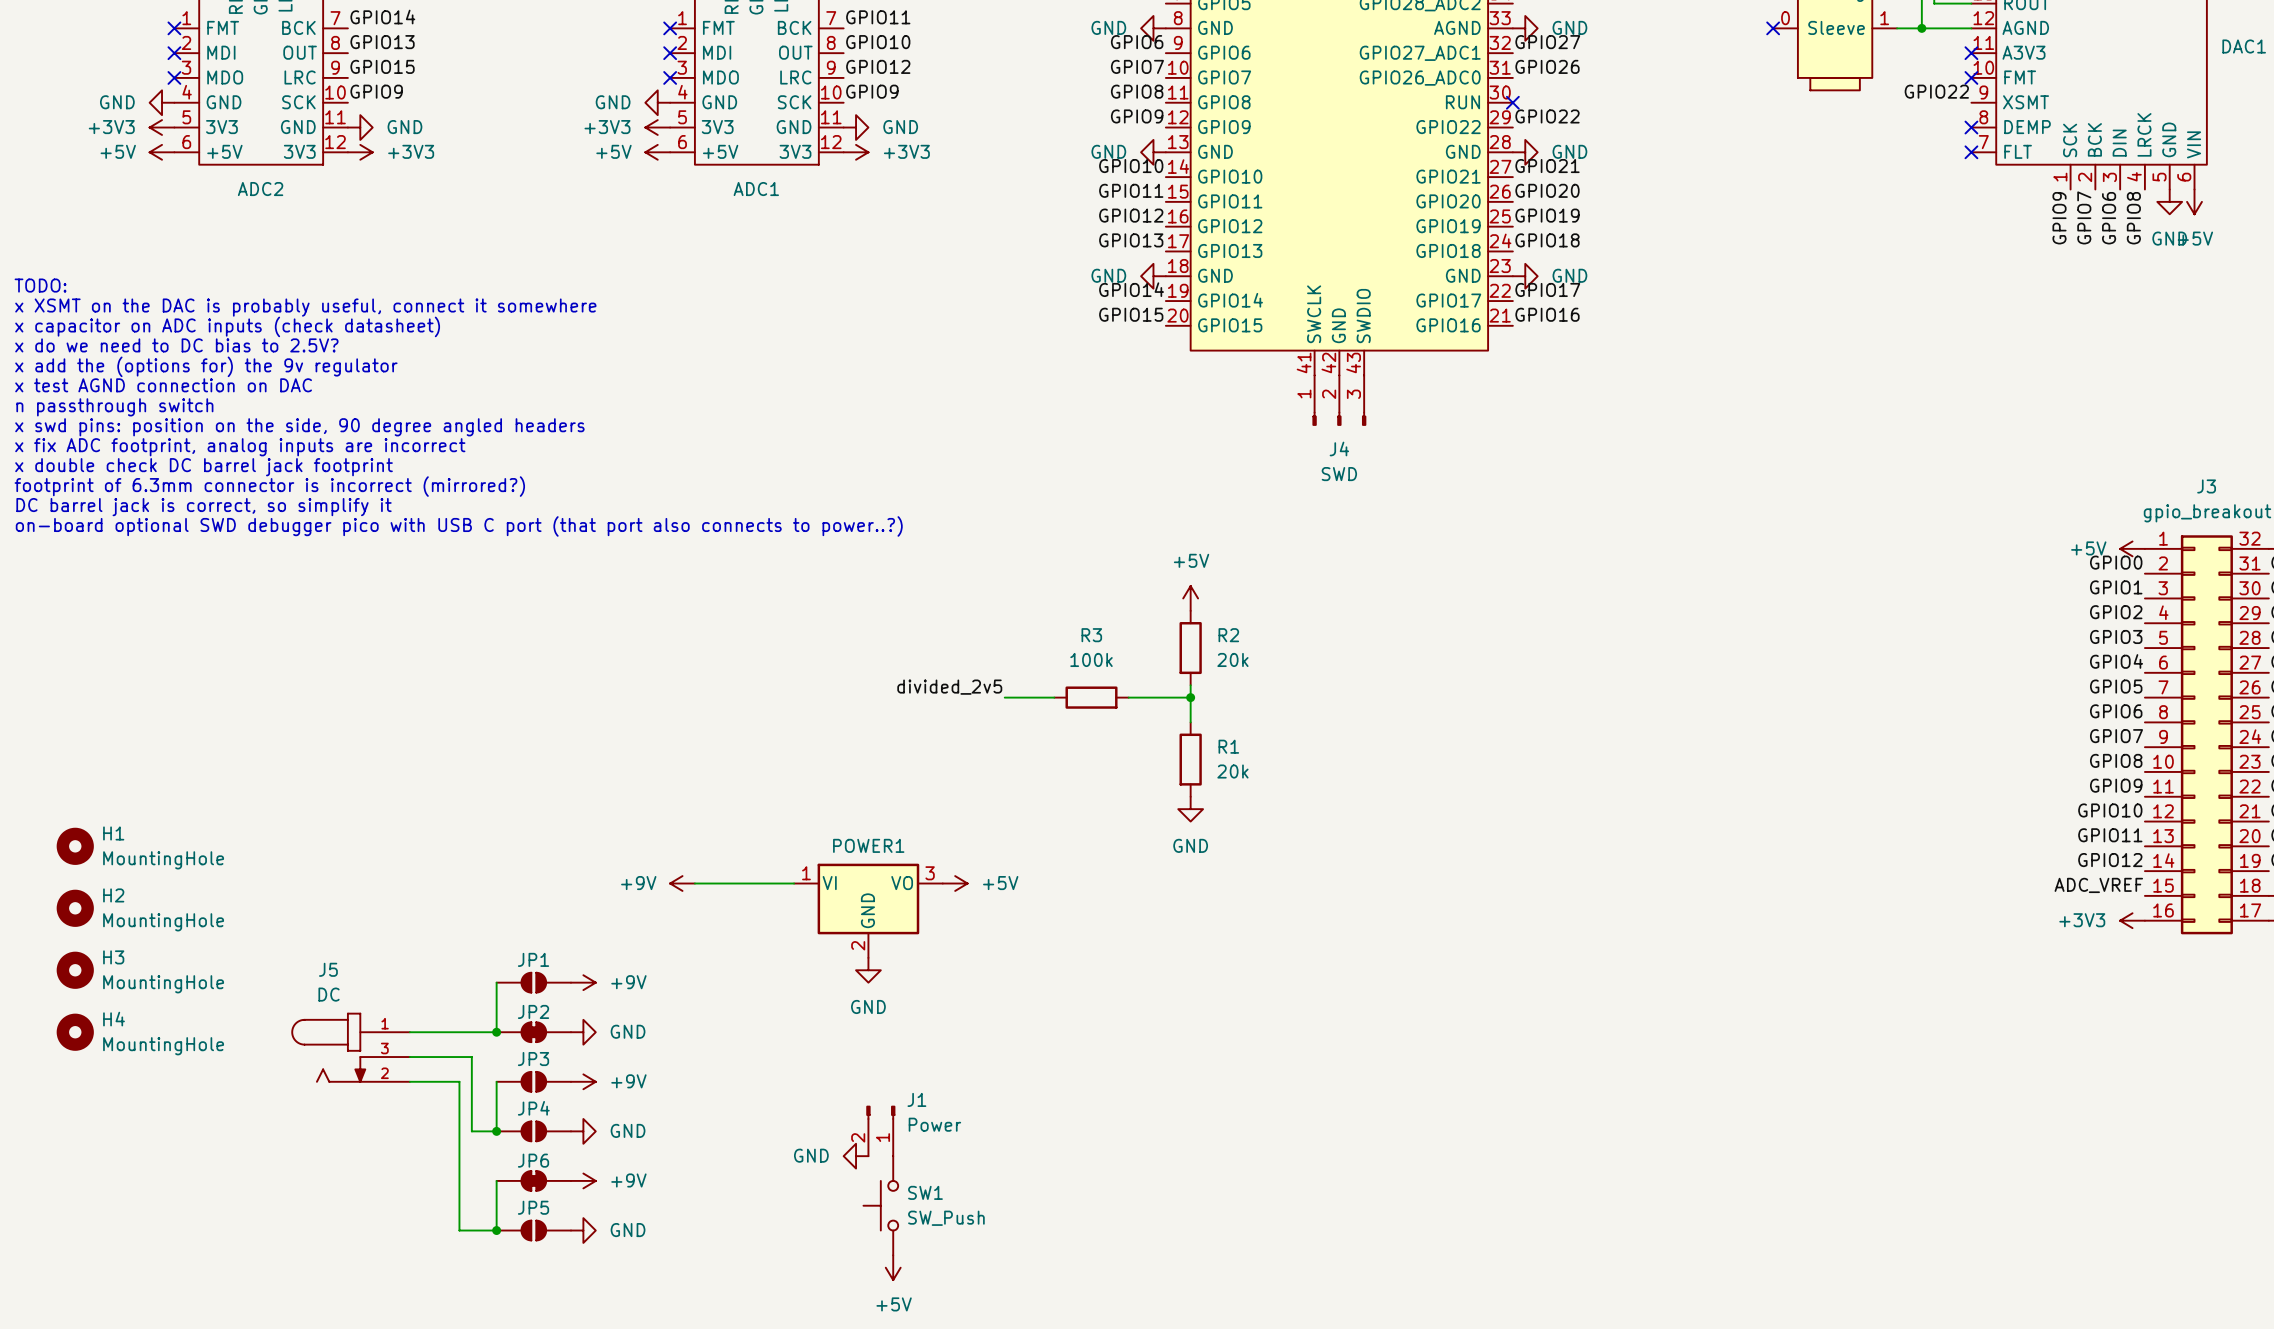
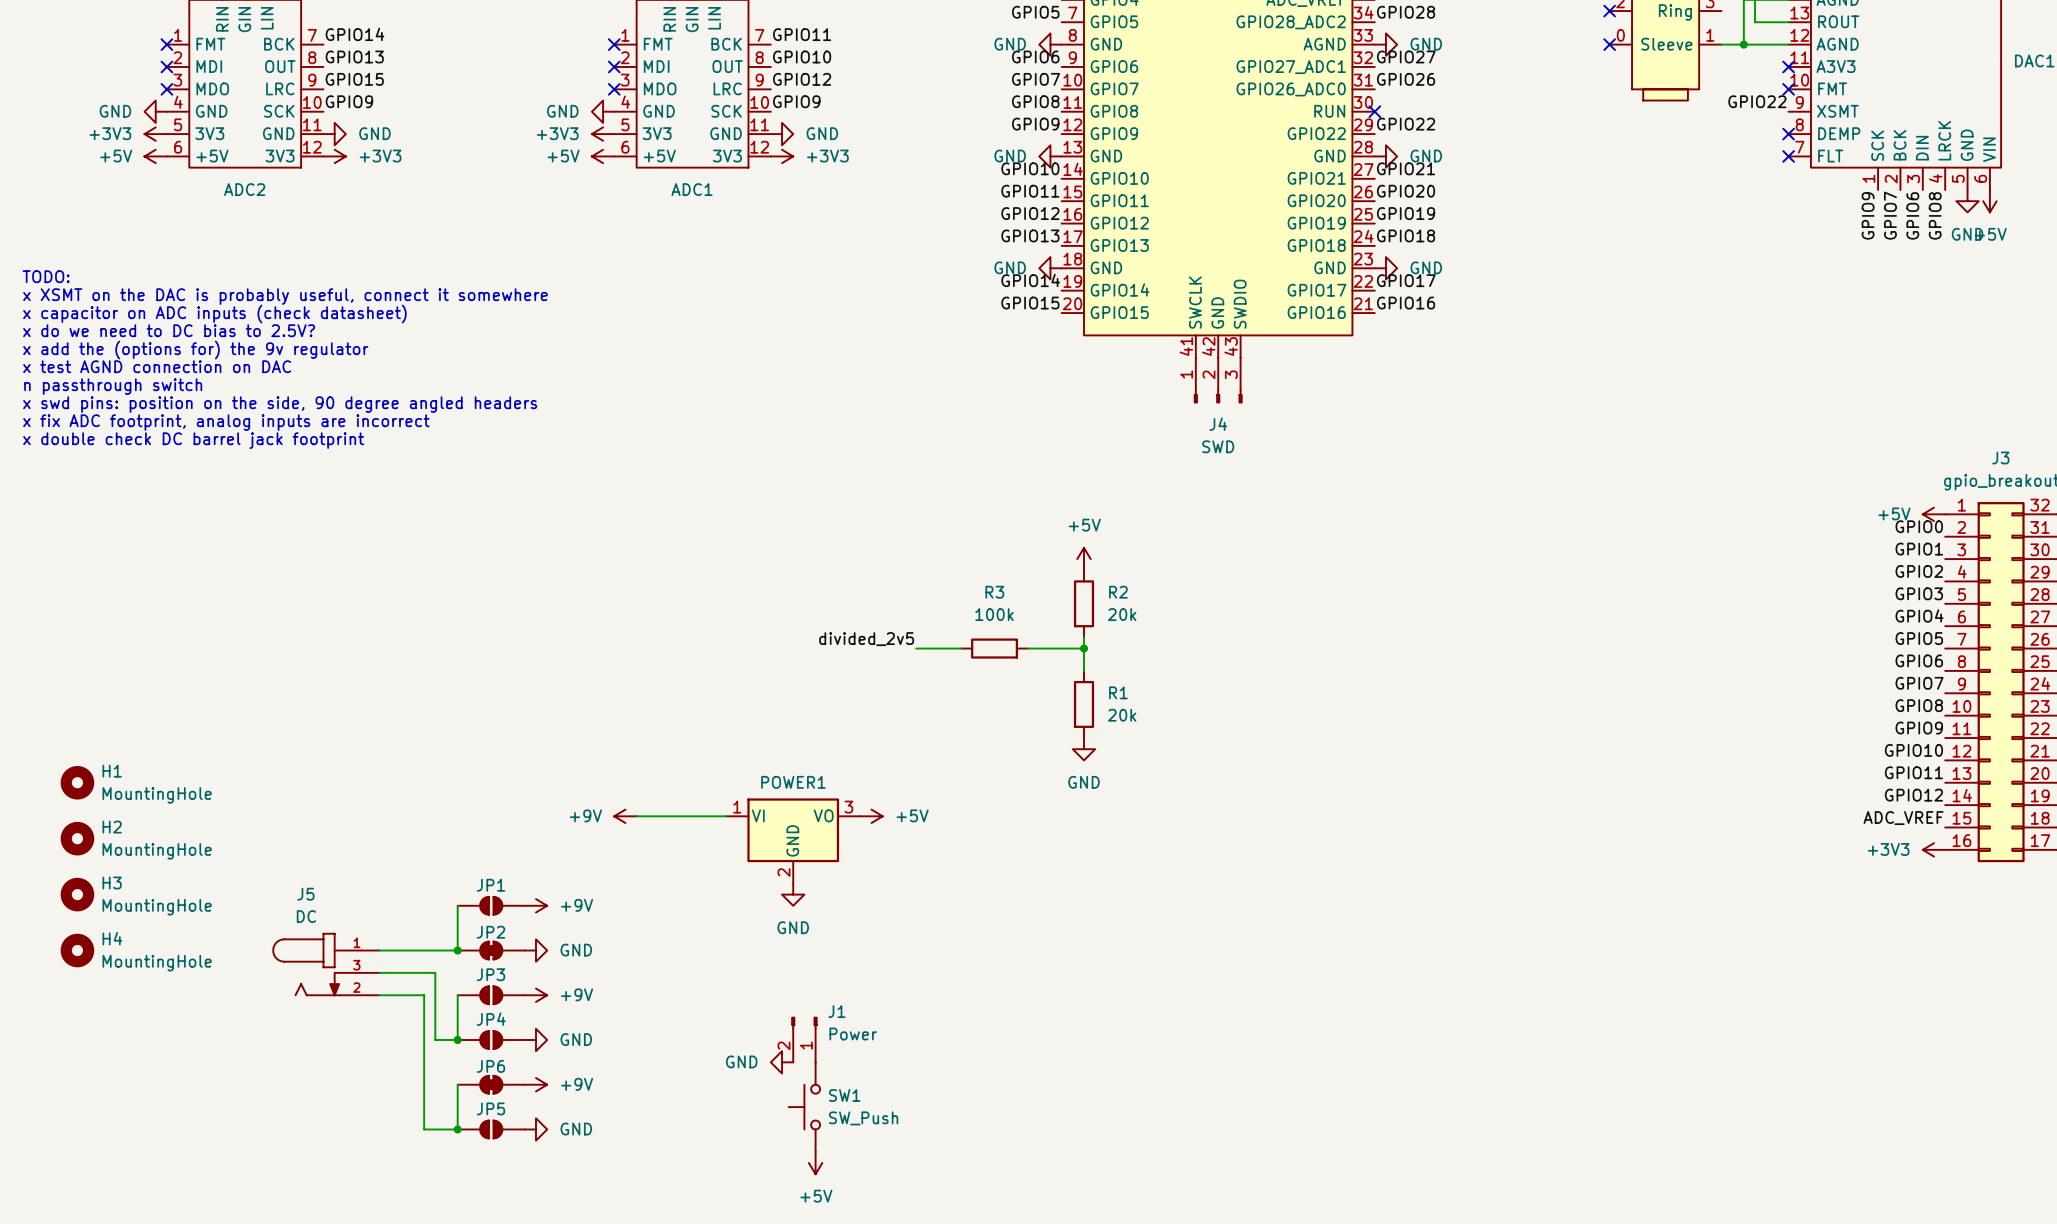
text: footprint of 6.3mm connector is incorrect (mirrored?) (269, 486) -> none
text: DC barrel jack is correct, so simplify it (204, 507) -> none
text: on-board optional SWD debugger pico with USB C port (that port also connects to power..?) (459, 526) -> none

